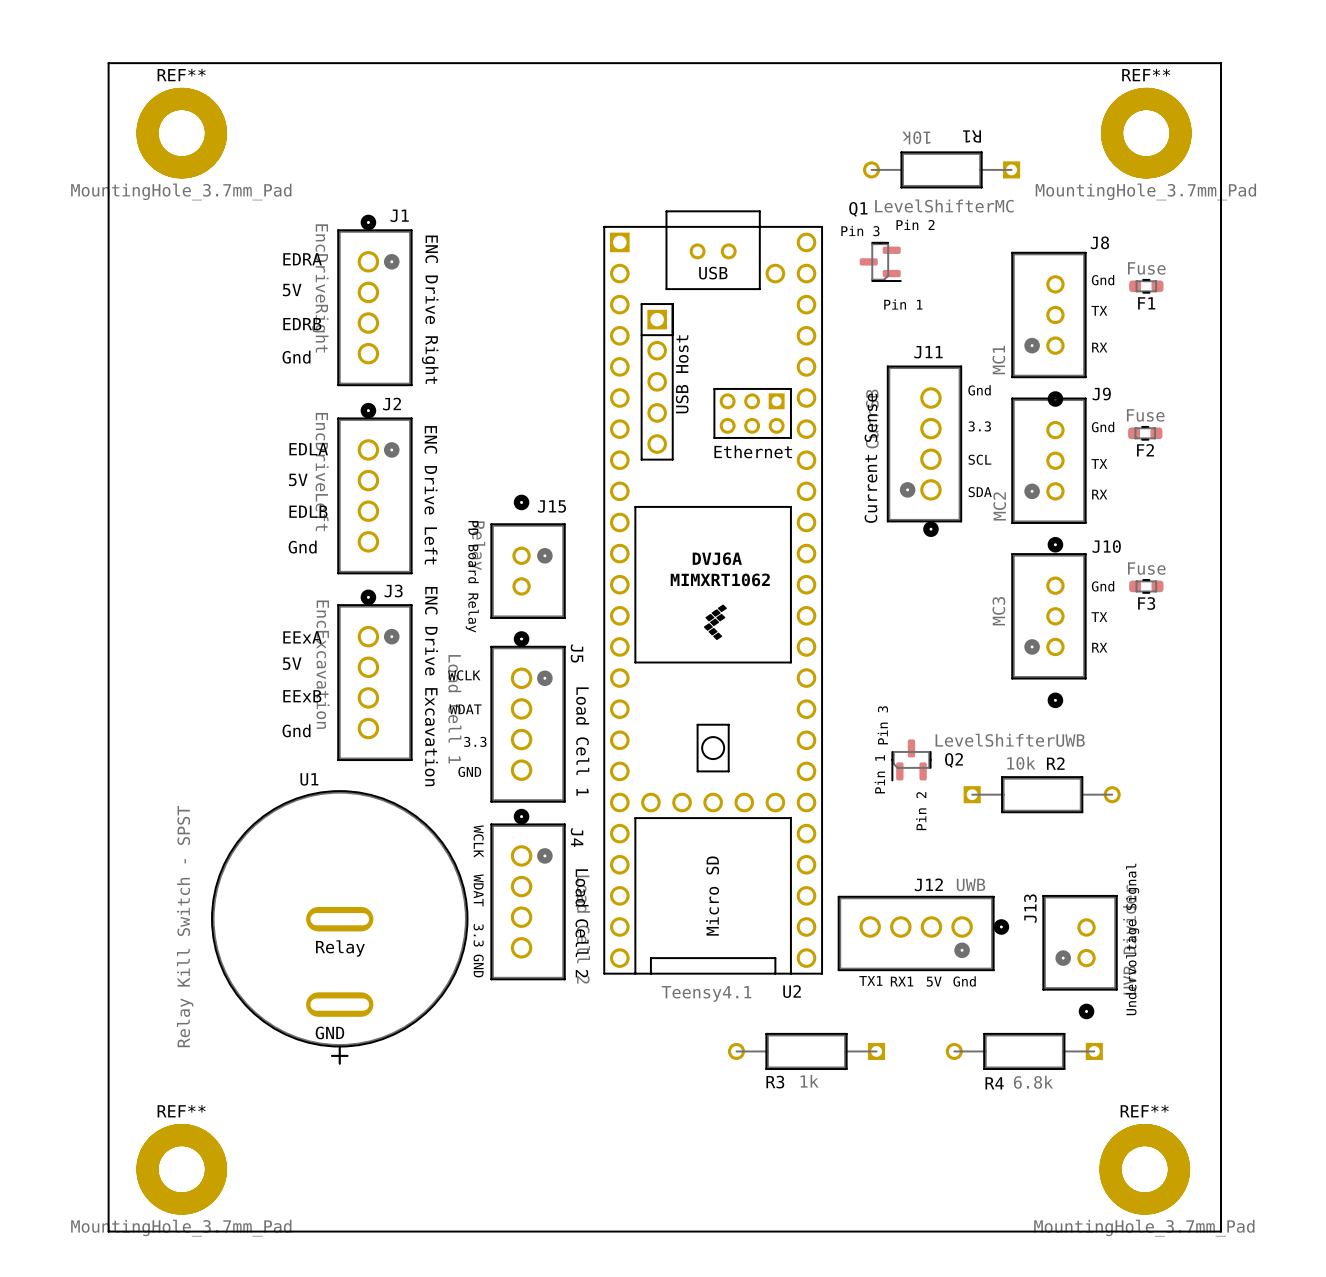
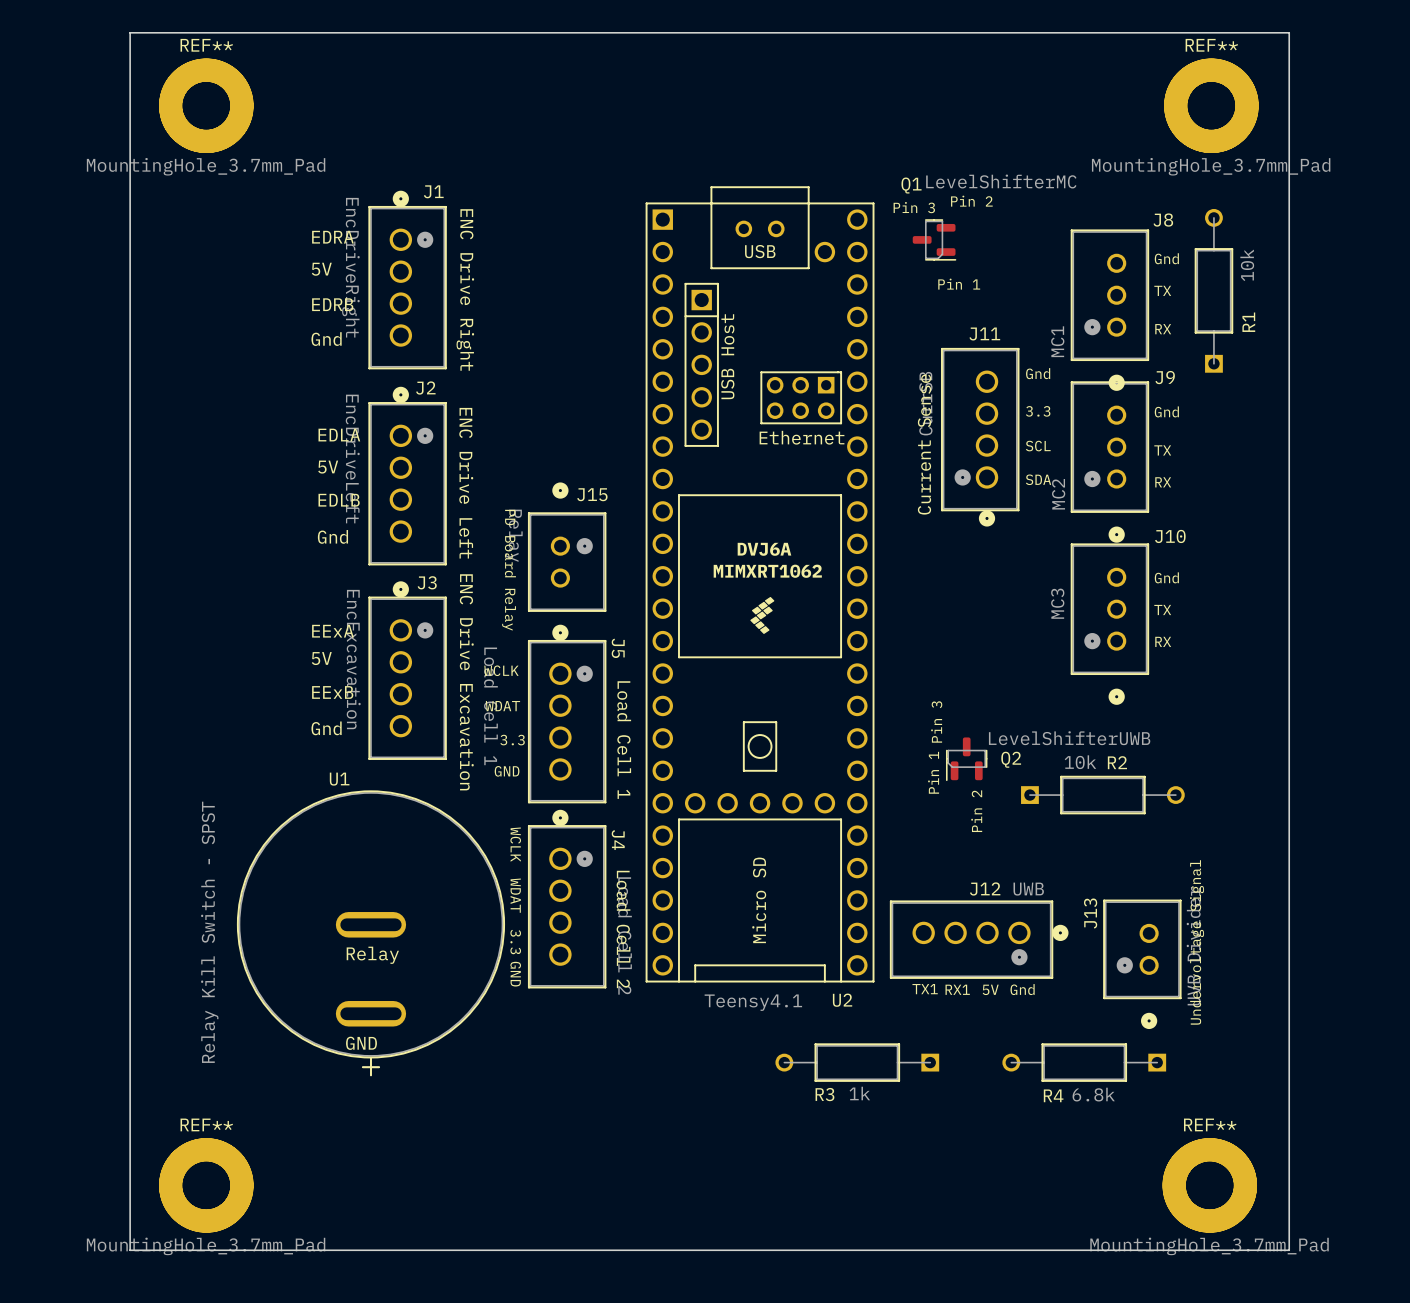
R1 rotation: 0° (941, 169) -> 90° clockwise (1213, 290)
R1 position: (941, 169) -> (1213, 290)
F1: Fuse (1146, 286) -> none
F2: Fuse (1145, 433) -> none
F3: Fuse (1146, 586) -> none

